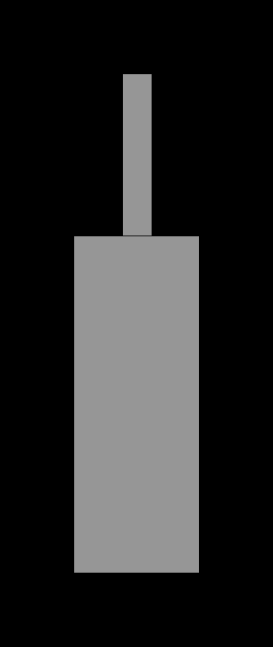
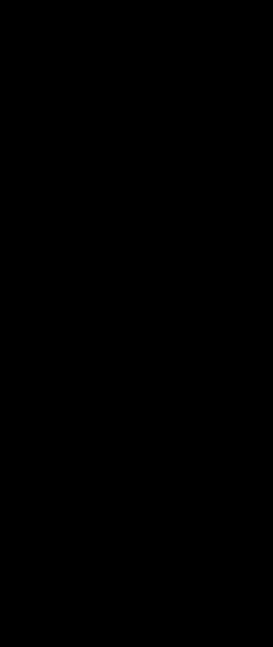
drawing: [74, 74, 199, 573] -> none

